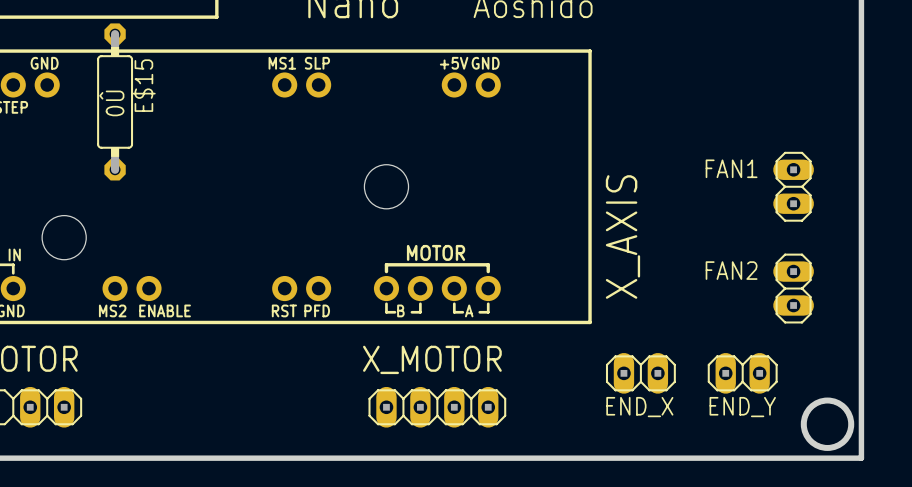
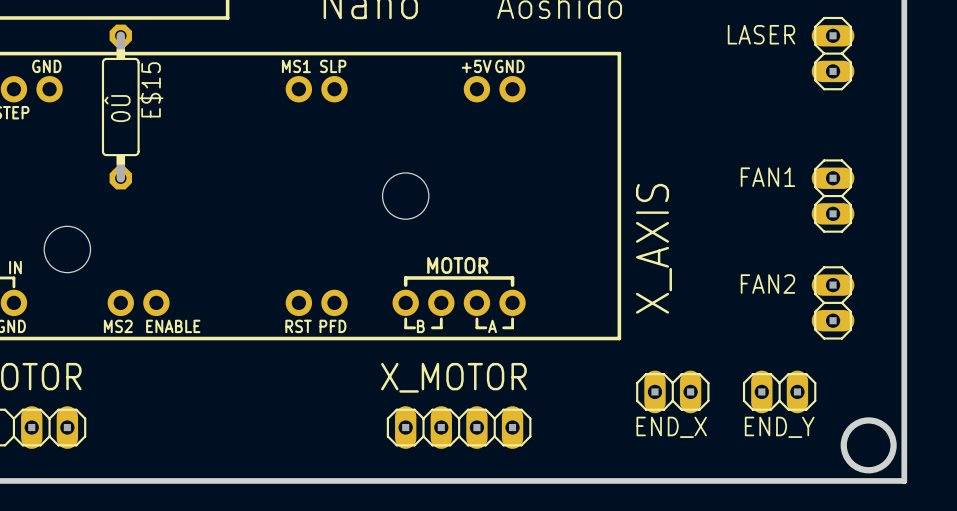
LASER: none -> (833, 53)

